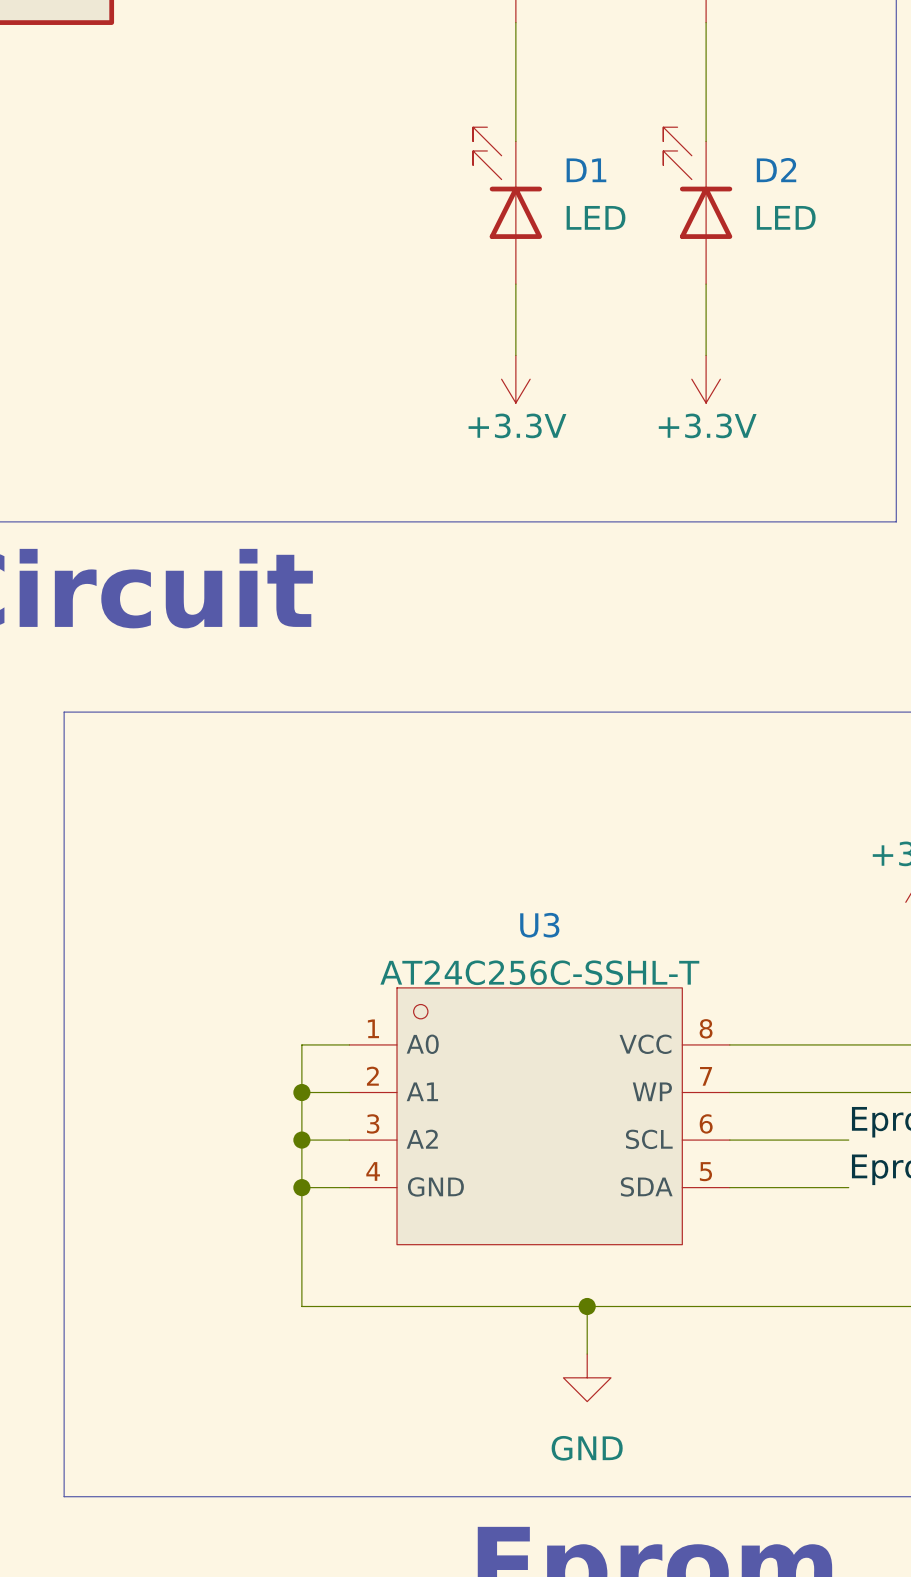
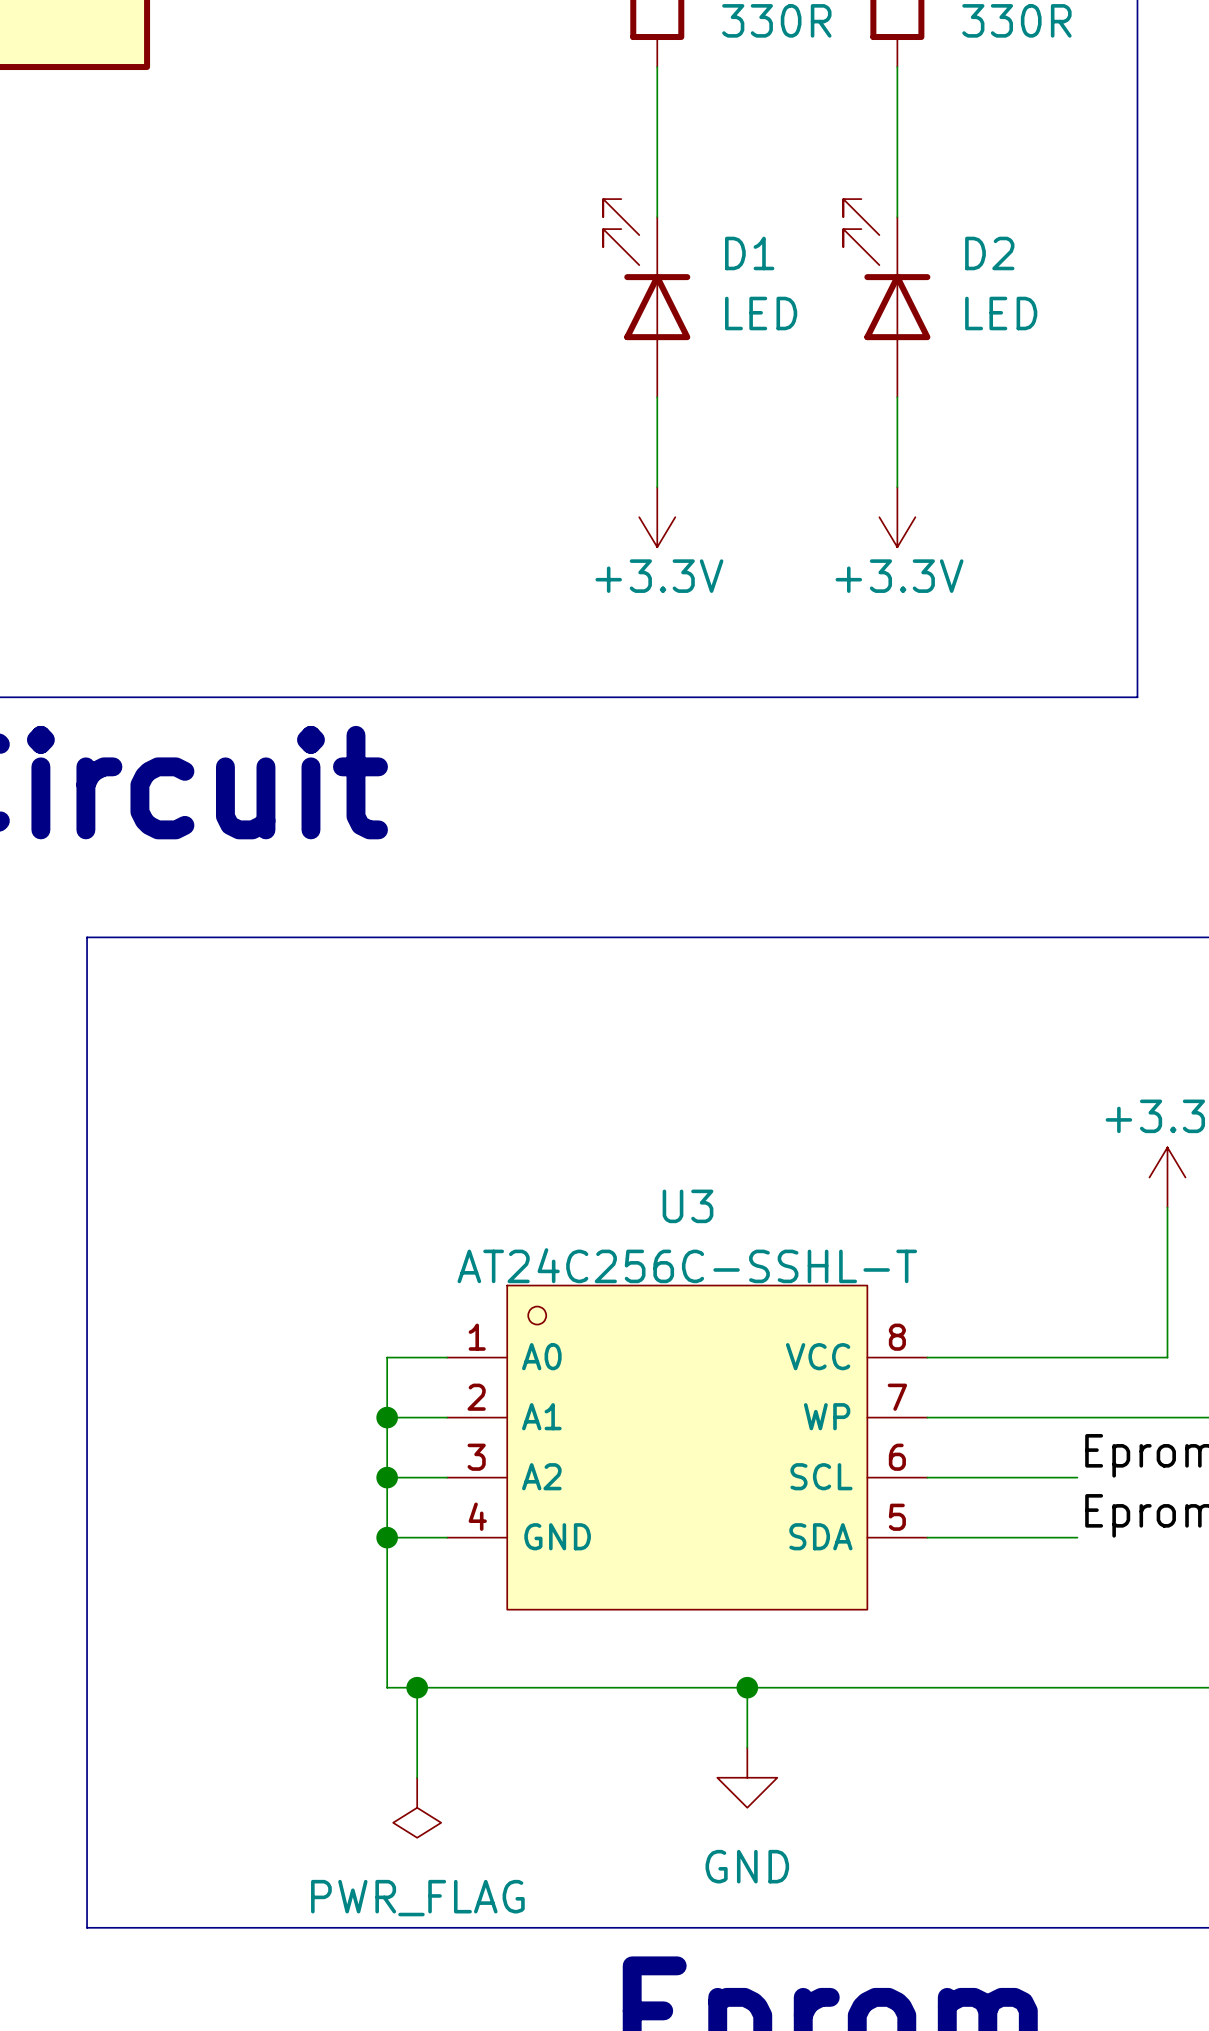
wire: none -> (417, 1687) (417, 1777)
junction: none -> (417, 1687)
power symbol: none -> PWR_FLAG (417, 1807)

